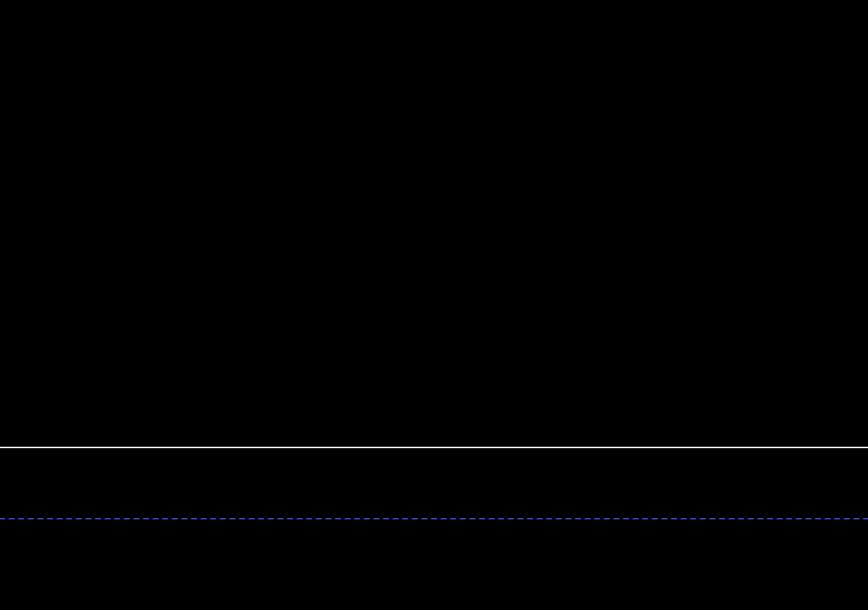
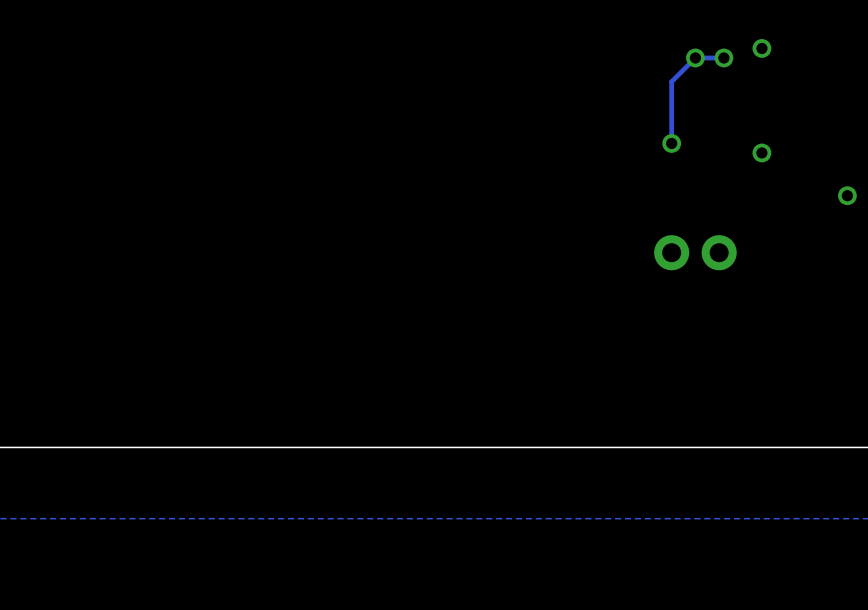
via: none -> (761, 48)
via: none -> (695, 57)
track: none -> (723, 57) (695, 57) (671, 81) (671, 143)
via: none -> (723, 57)
via: none -> (671, 143)
via: none -> (761, 152)
via: none -> (847, 195)
part: none -> (695, 252)

